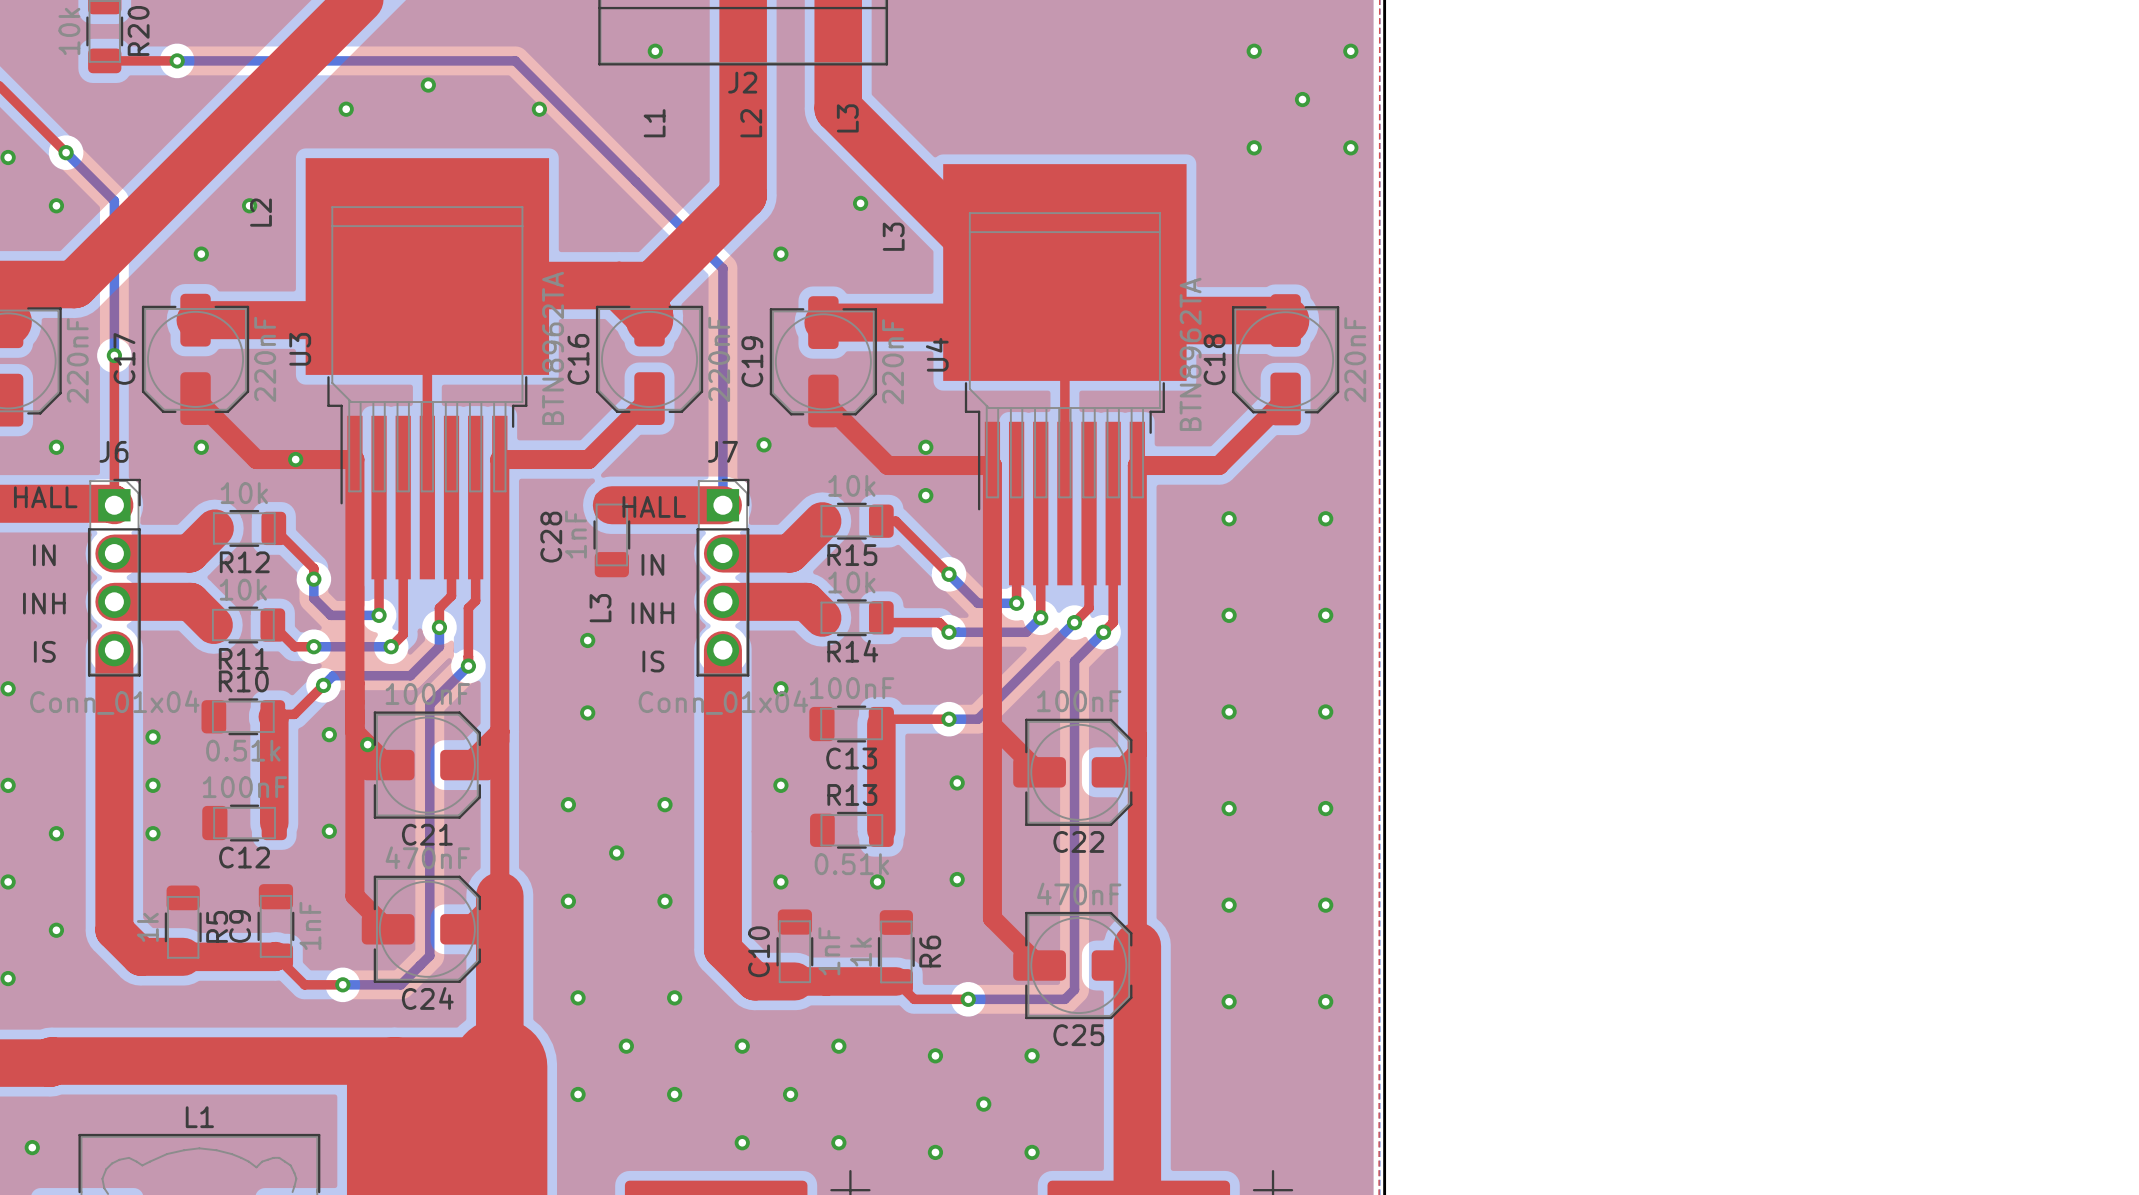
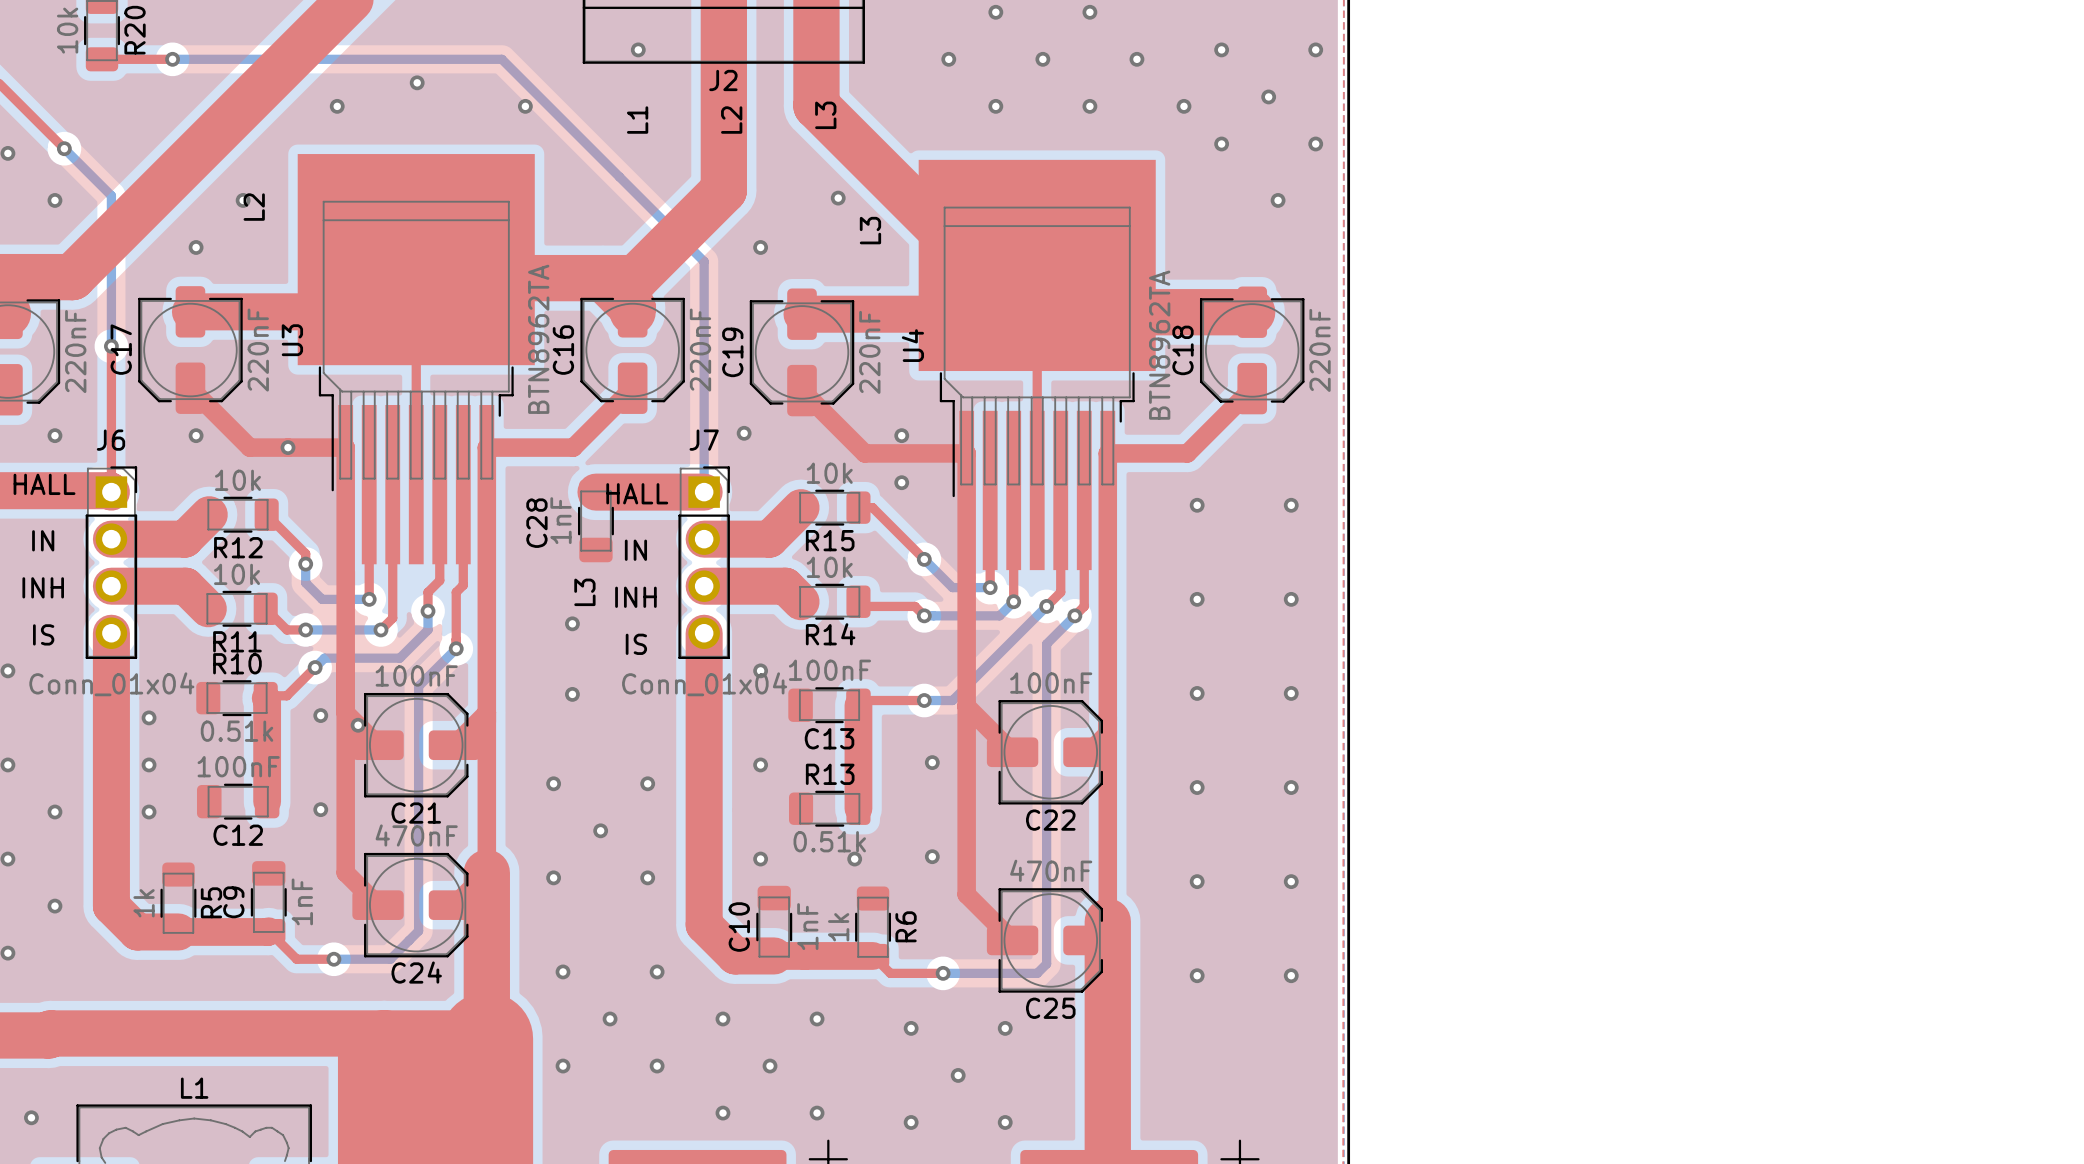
via: none -> (995, 12)
via: none -> (1089, 12)
via: none -> (948, 59)
via: none -> (1042, 59)
via: none -> (1136, 59)
via: none -> (995, 106)
via: none -> (1089, 106)
via: none -> (1183, 106)
via: none -> (1278, 200)

